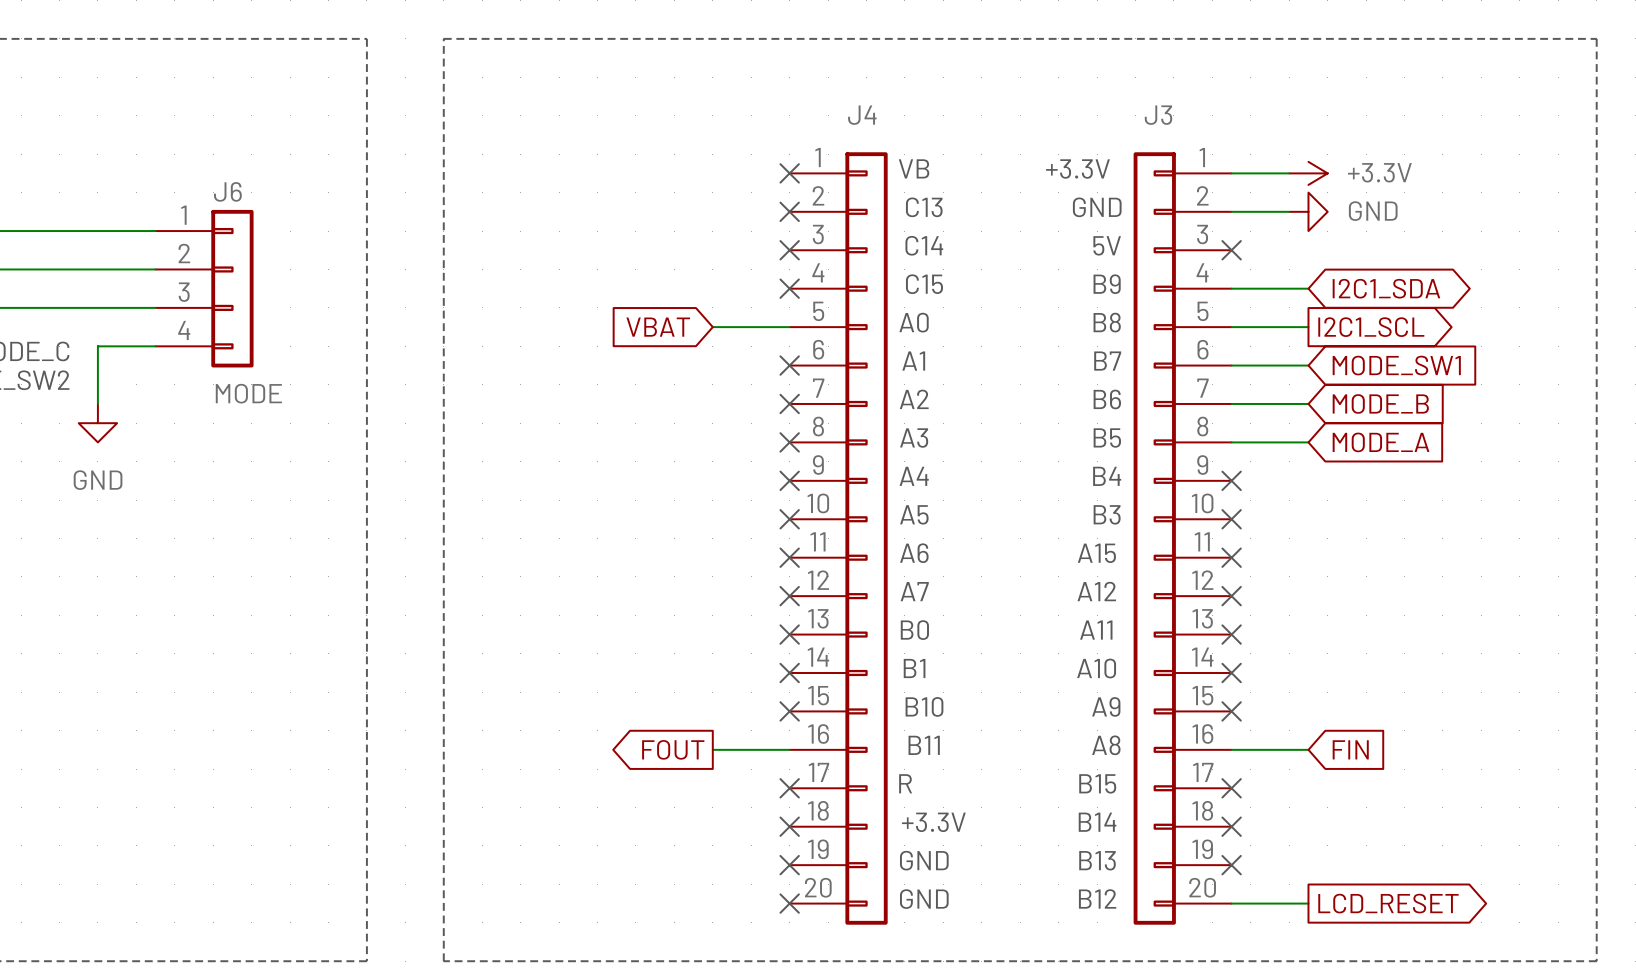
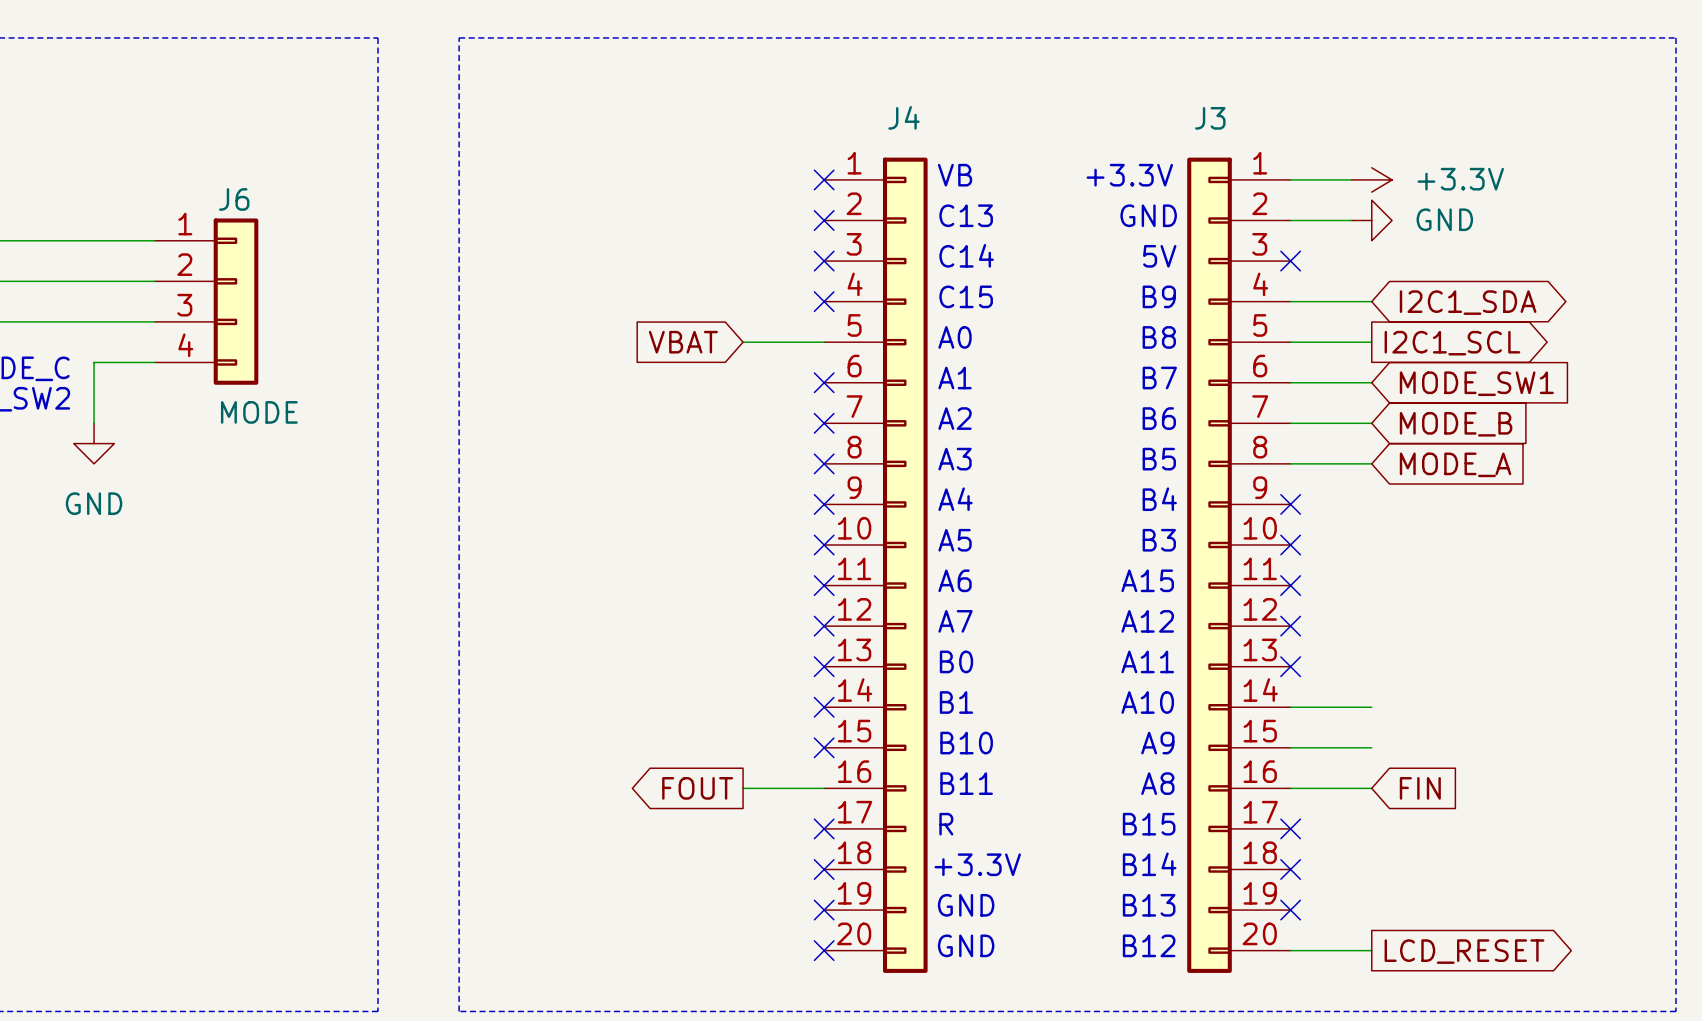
wire: none -> (1290, 707) (1371, 707)
no-connect mark: (1231, 672) -> none
wire: none -> (1290, 747) (1371, 747)
no-connect mark: (1231, 711) -> none

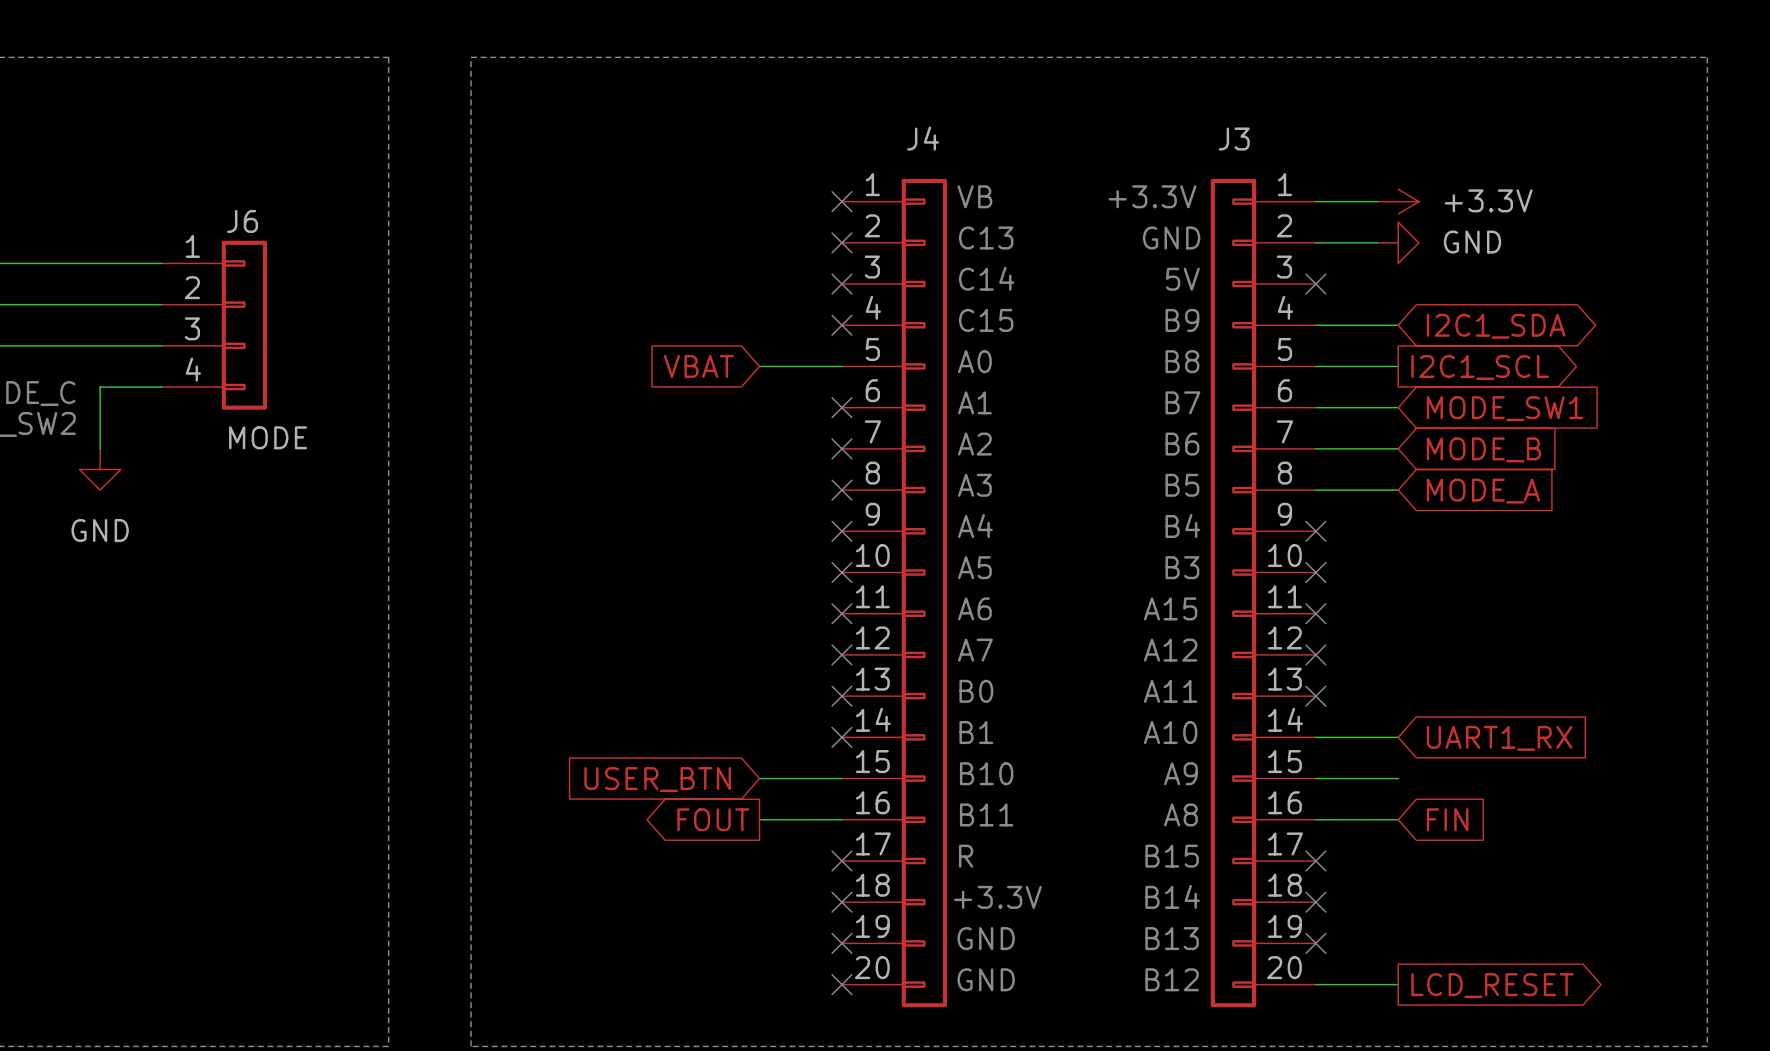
global label: none -> UART1_RX (1499, 738)
wire: none -> (759, 778) (841, 778)
no-connect mark: (824, 747) -> none
global label: none -> USER_BTN (657, 779)

